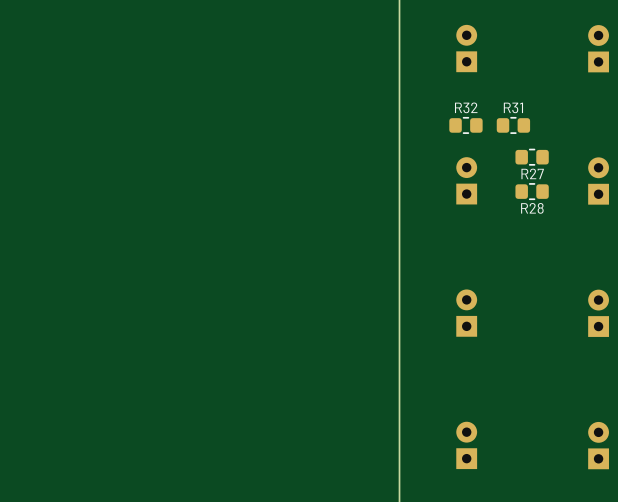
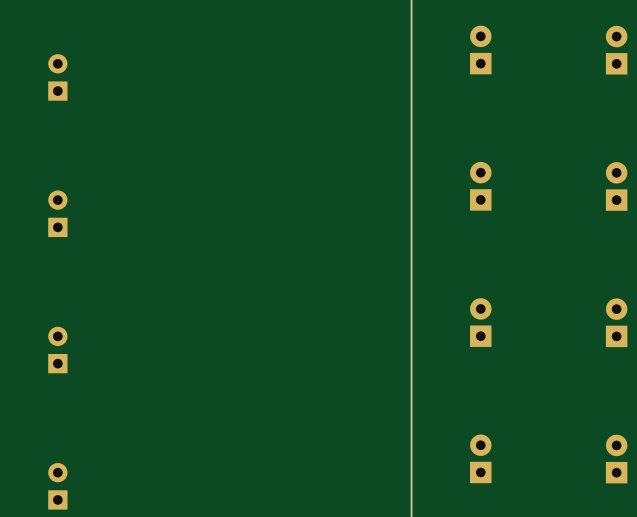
part: none -> (57, 77)
R32: (465, 125) -> none
R31: (513, 125) -> none
R27: (532, 157) -> none
R28: (532, 191) -> none
part: none -> (57, 213)
part: none -> (57, 350)
part: none -> (57, 486)

